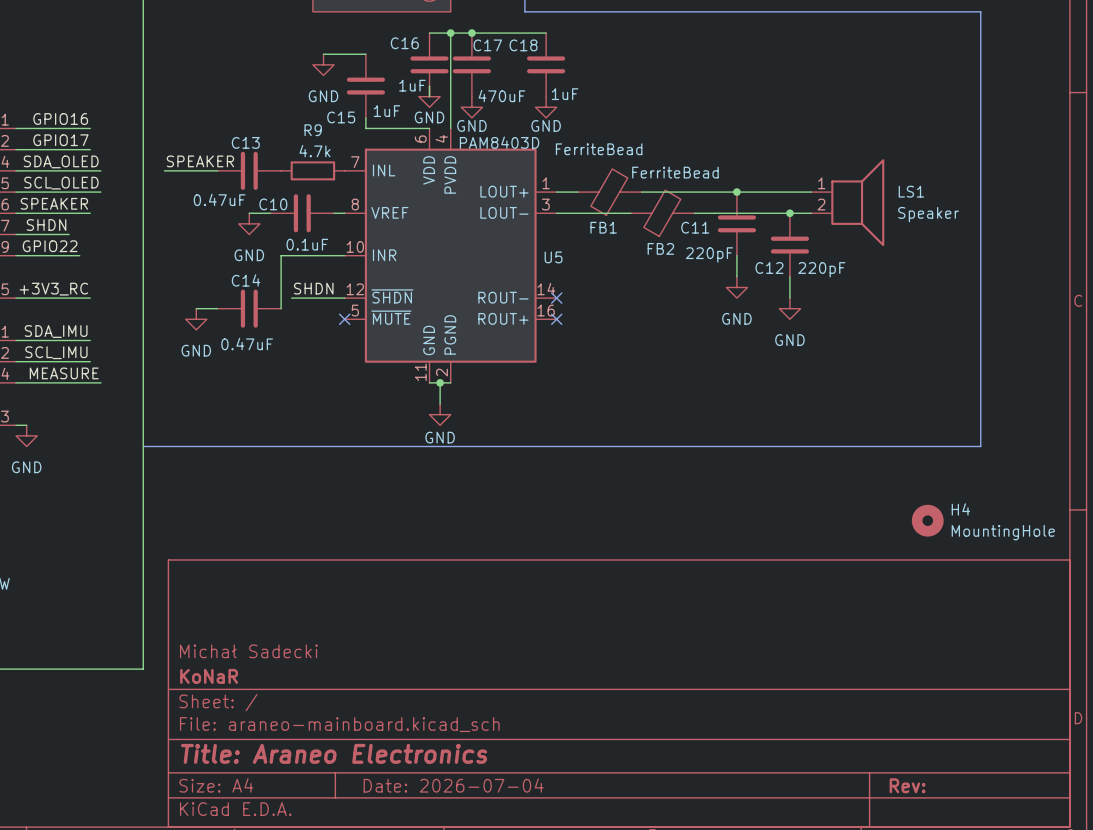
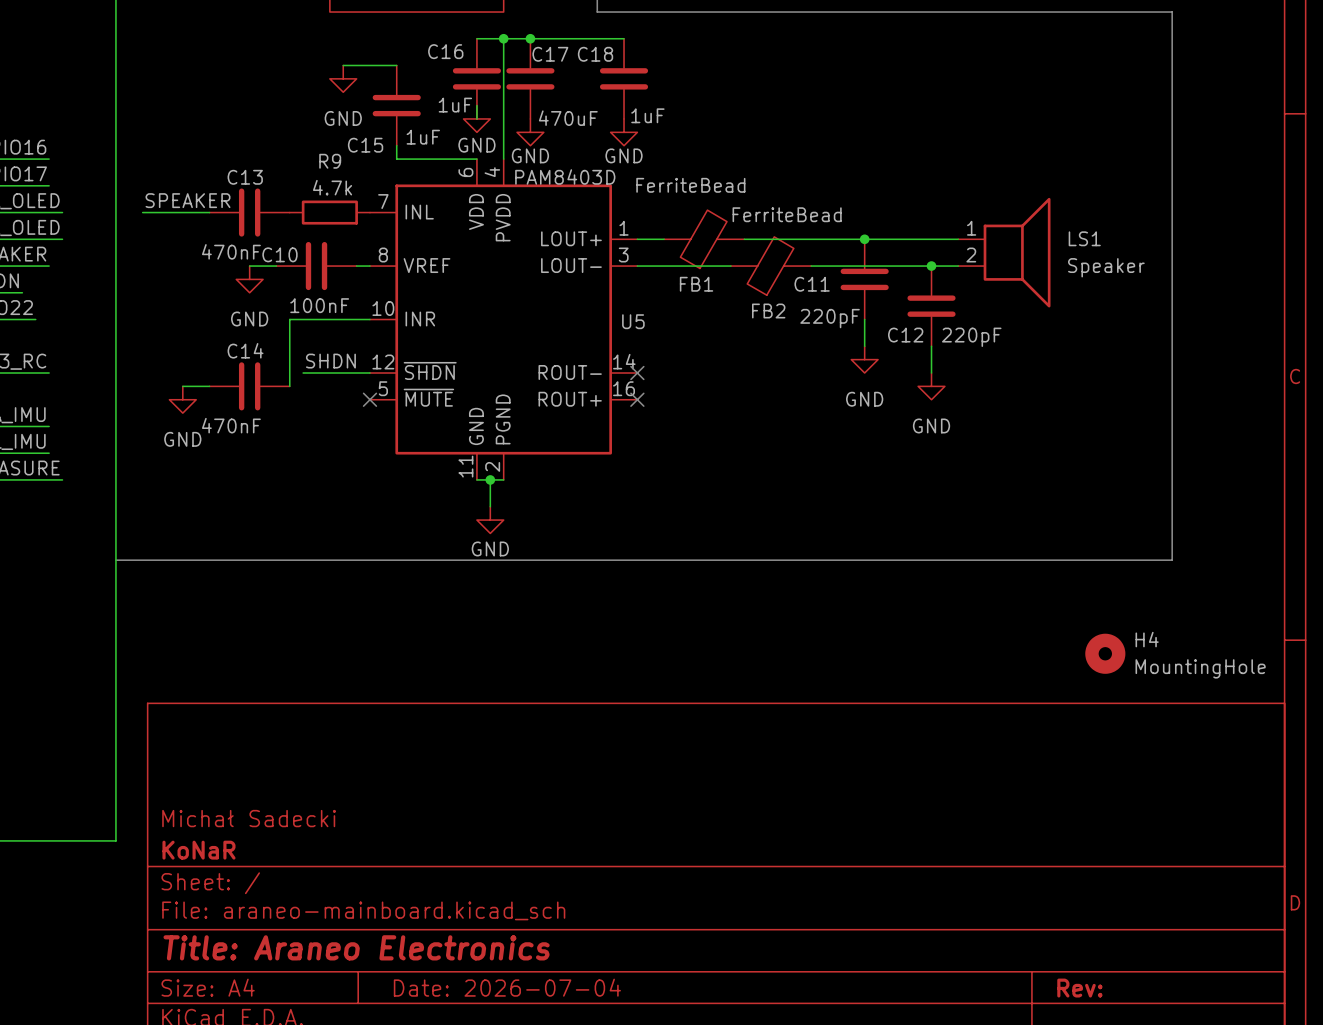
C13 value: 0.47uF (219, 199) -> 470nF (231, 251)
C10 value: 0.1uF (307, 244) -> 100nF (319, 305)
C14 value: 0.47uF (247, 344) -> 470nF (231, 425)

